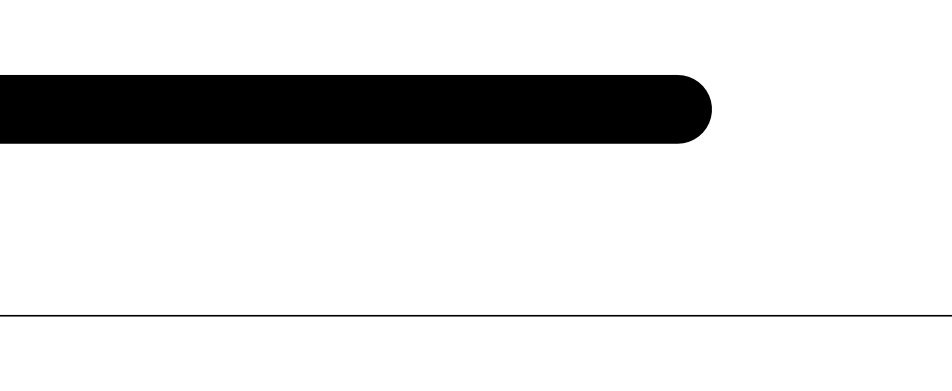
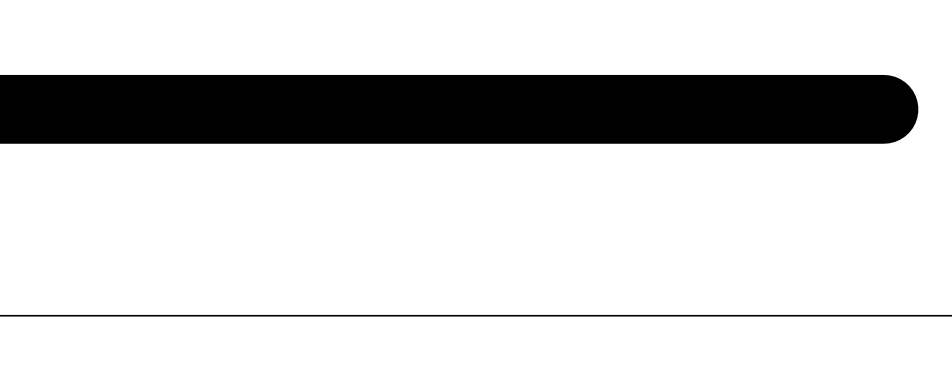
board edge: none -> (883, 109) (677, 109)

